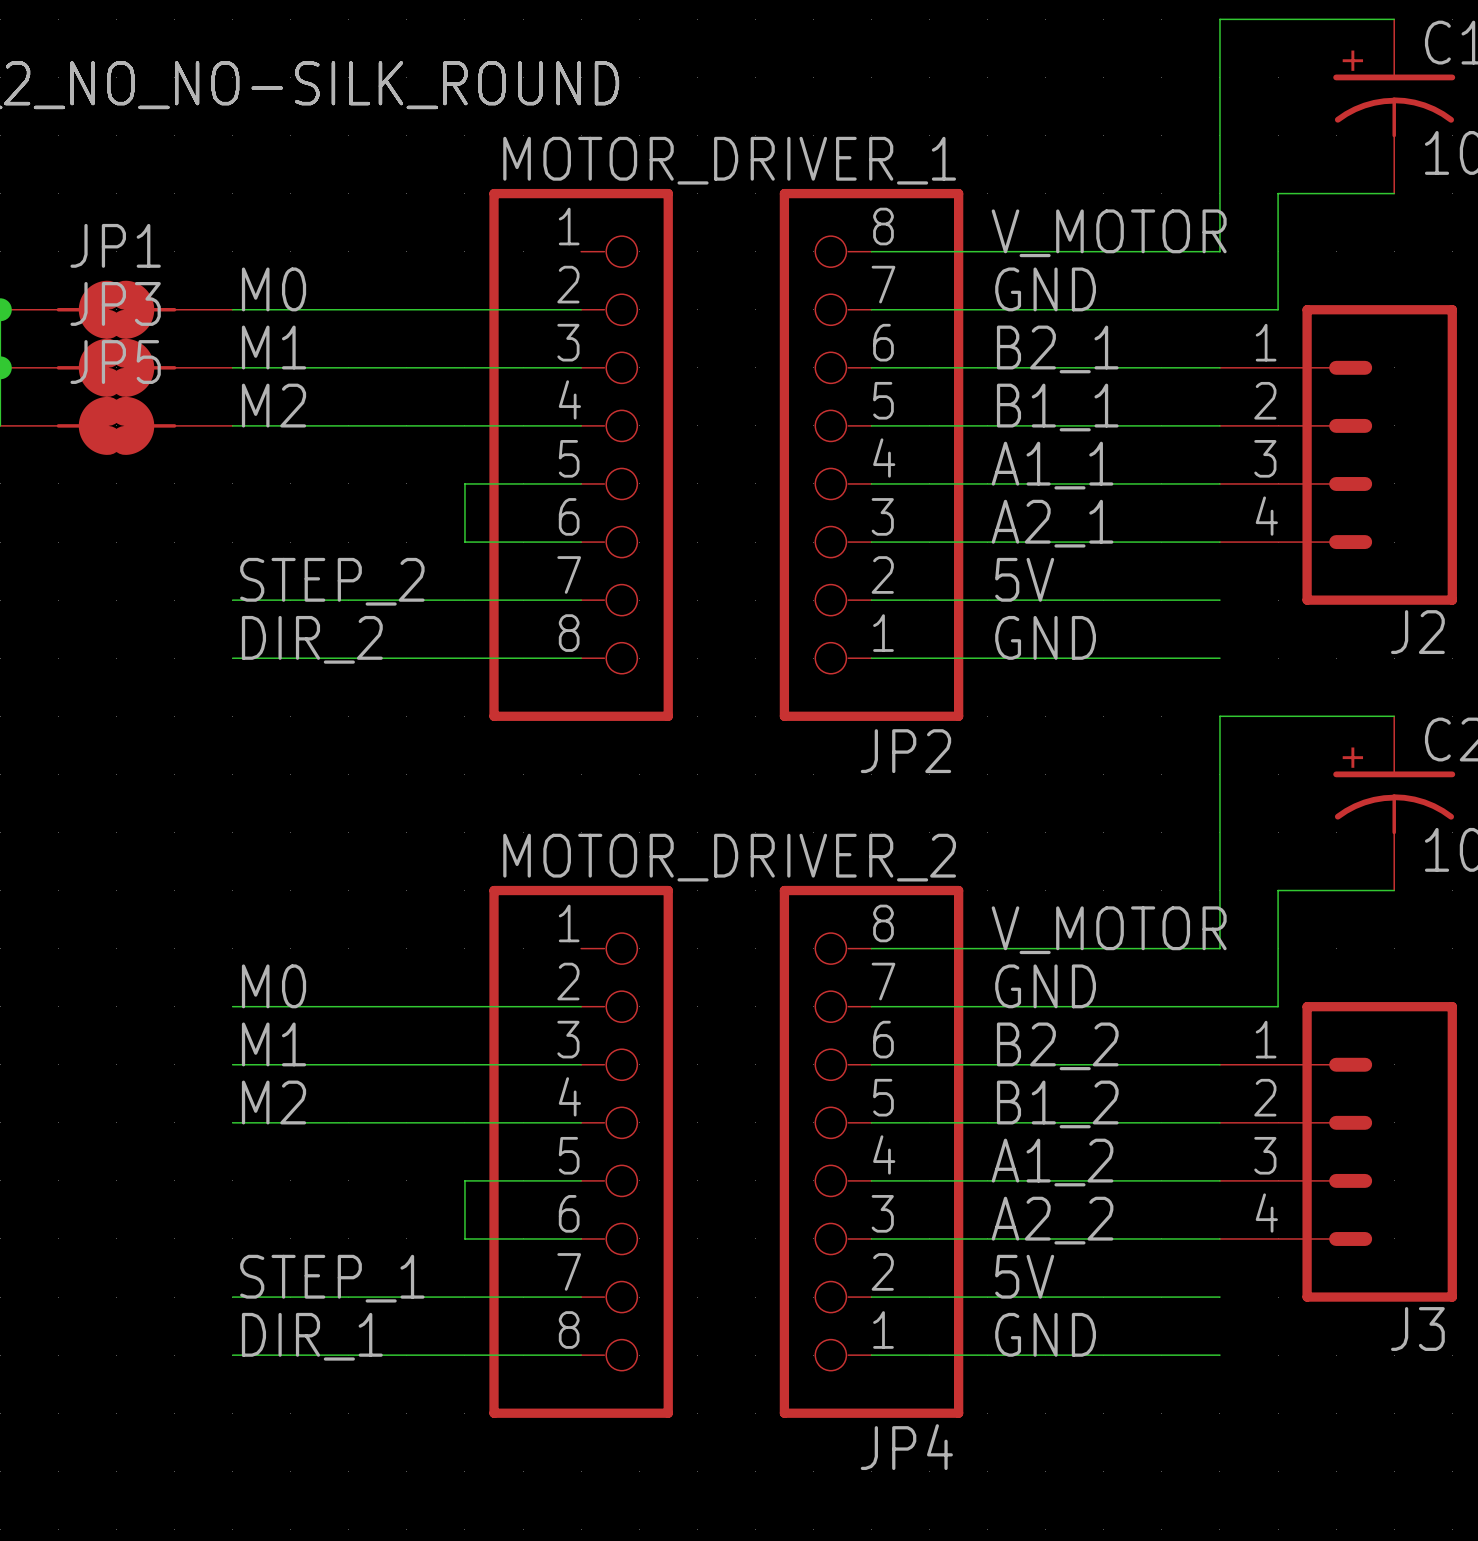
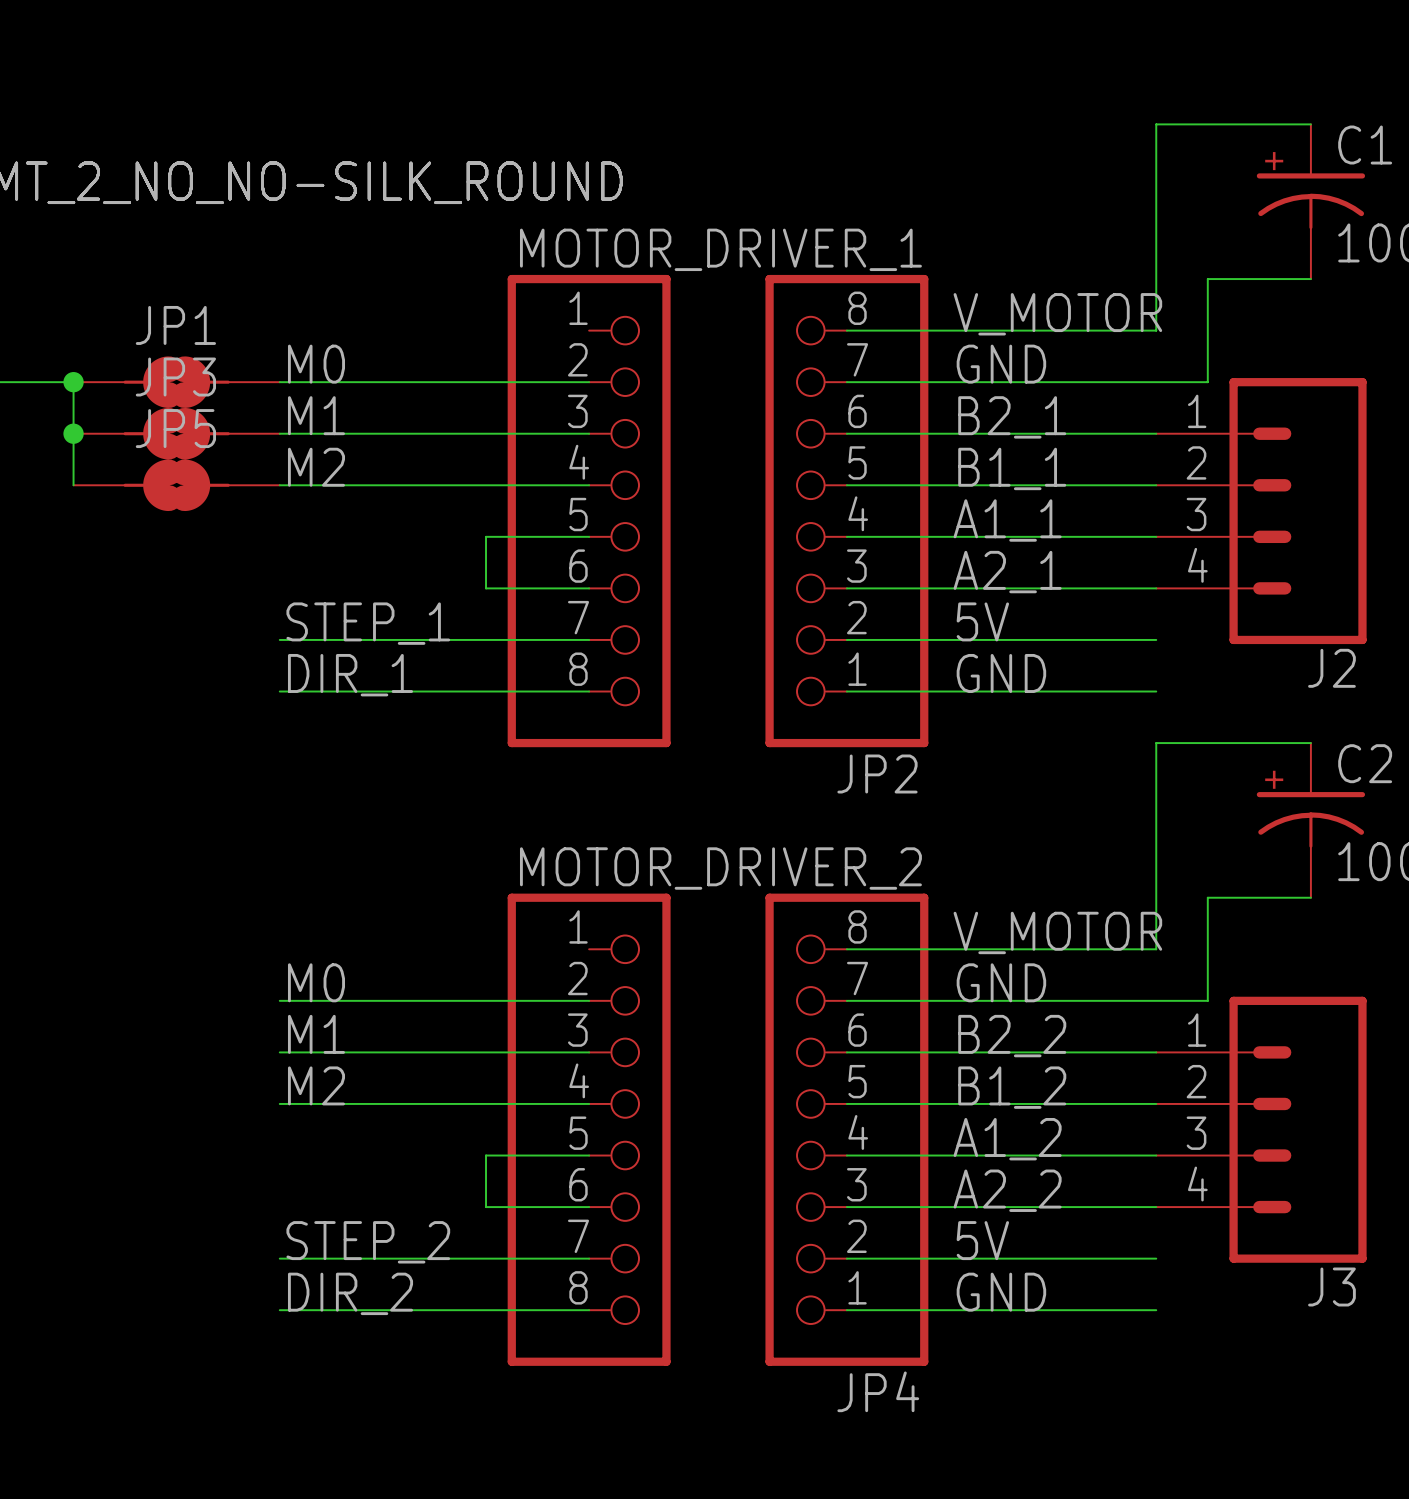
label: STEP_2 (332, 581) -> STEP_1 (368, 623)
label: DIR_2 (312, 639) -> DIR_1 (350, 675)
label: STEP_1 (332, 1278) -> STEP_2 (368, 1242)
label: DIR_1 (312, 1336) -> DIR_2 (350, 1293)

